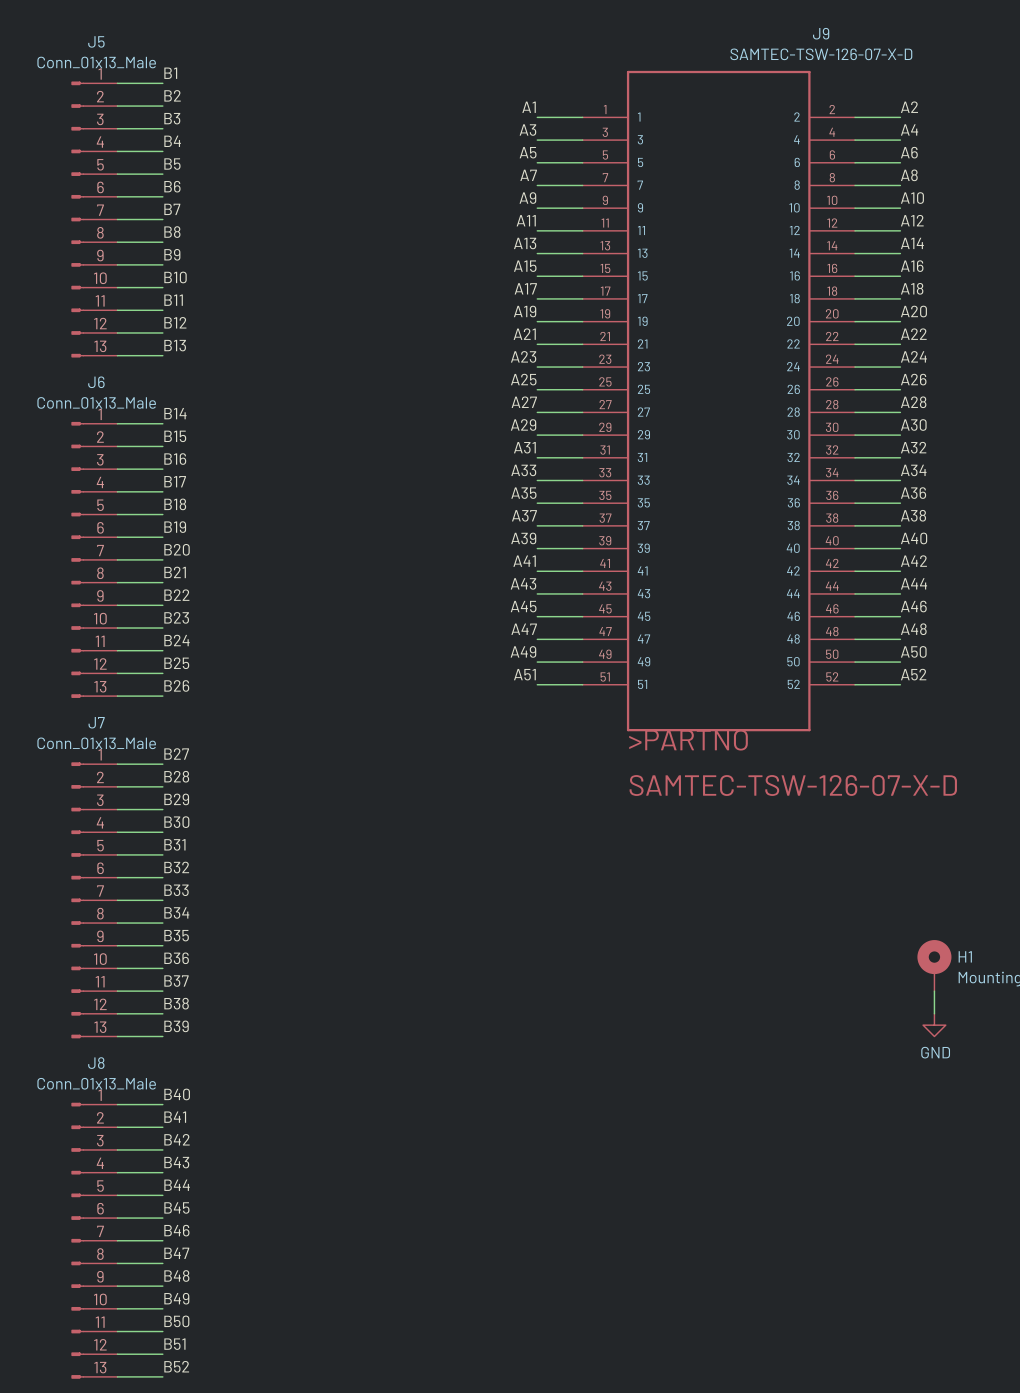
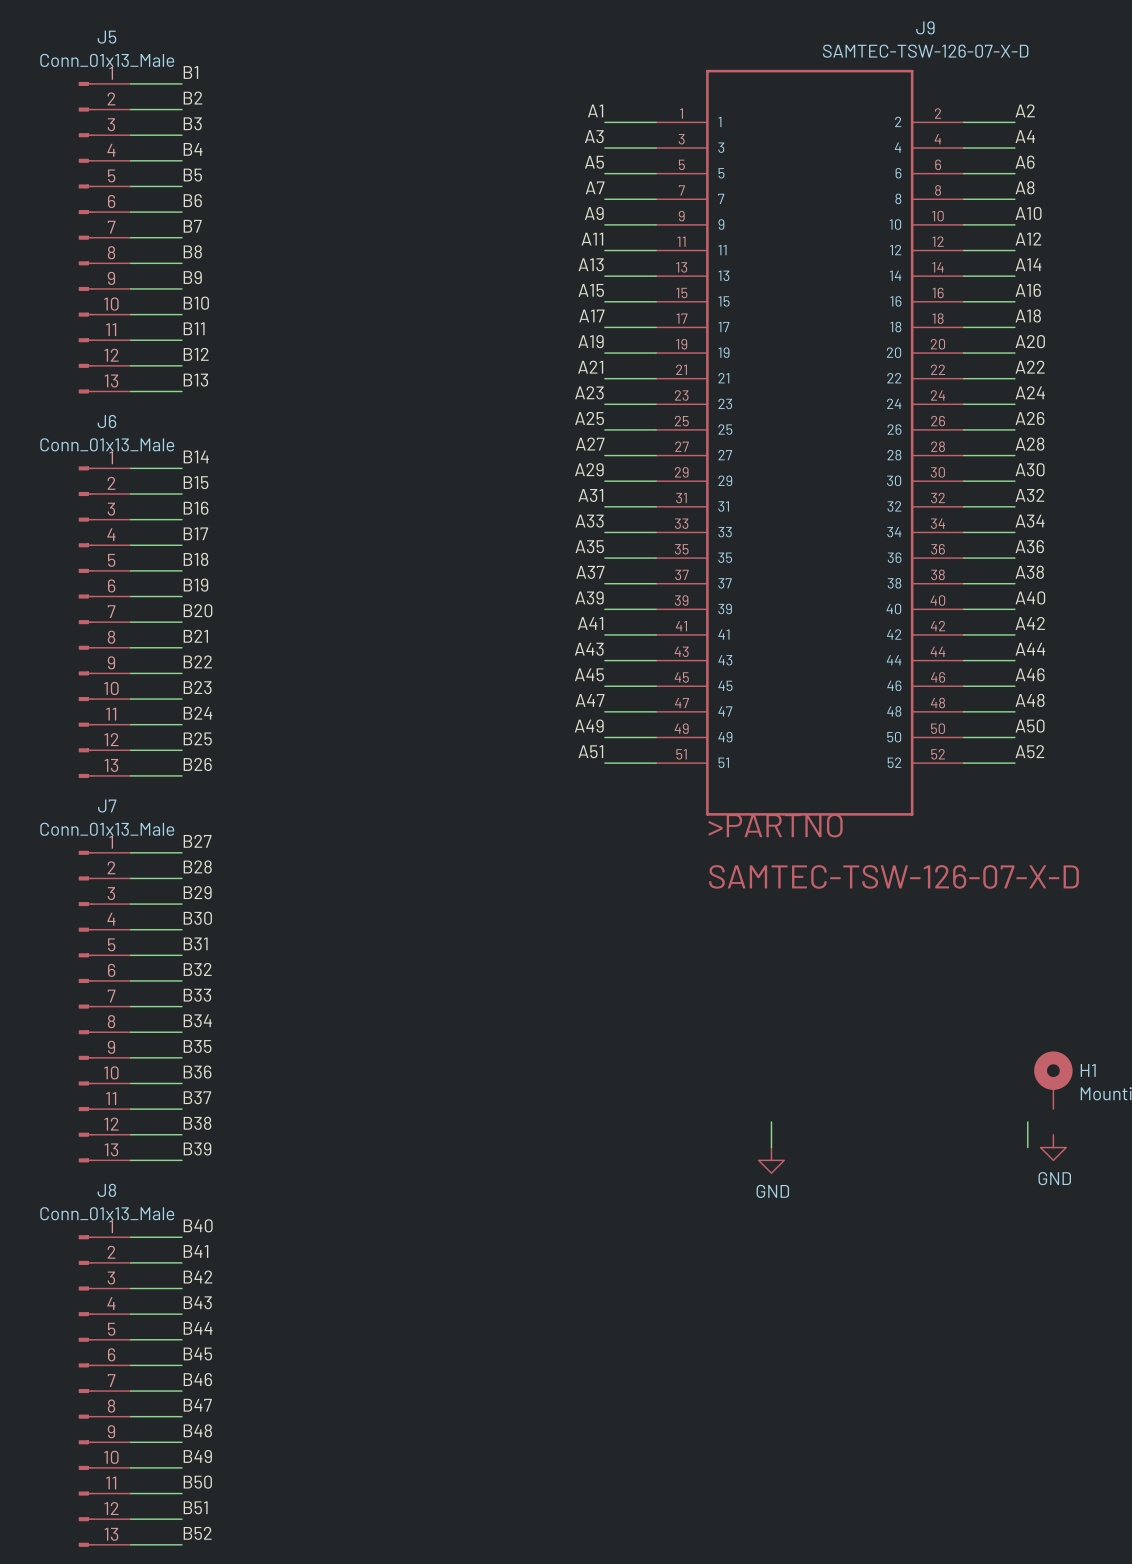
wire: (934, 991) (934, 1013) -> (1027, 1121) (1027, 1147)
wire: none -> (771, 1121) (771, 1147)
power symbol: none -> GND (771, 1160)

